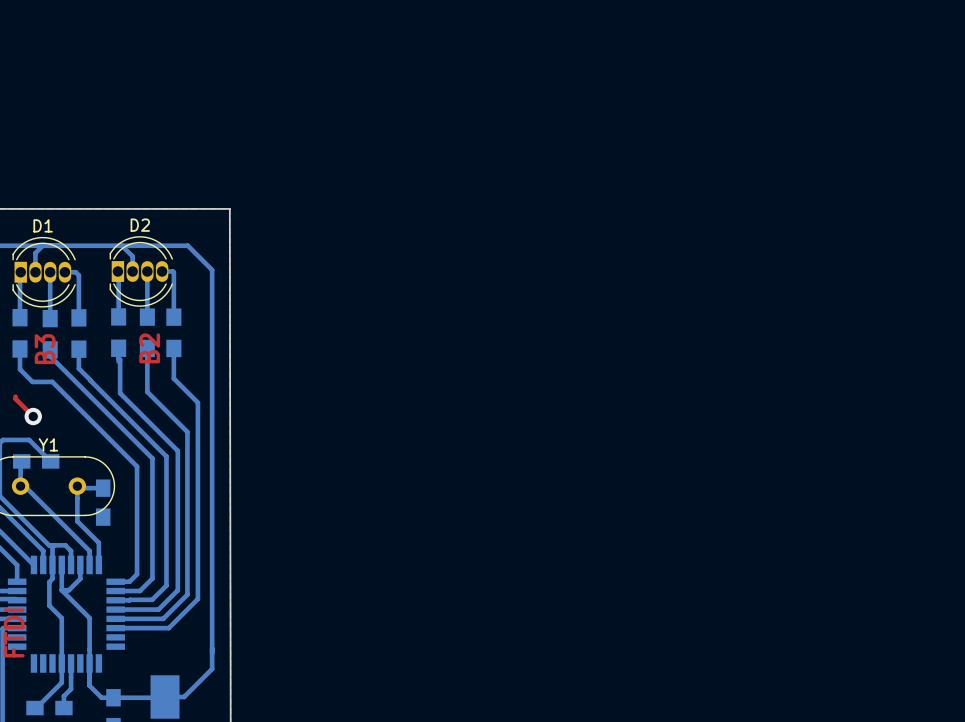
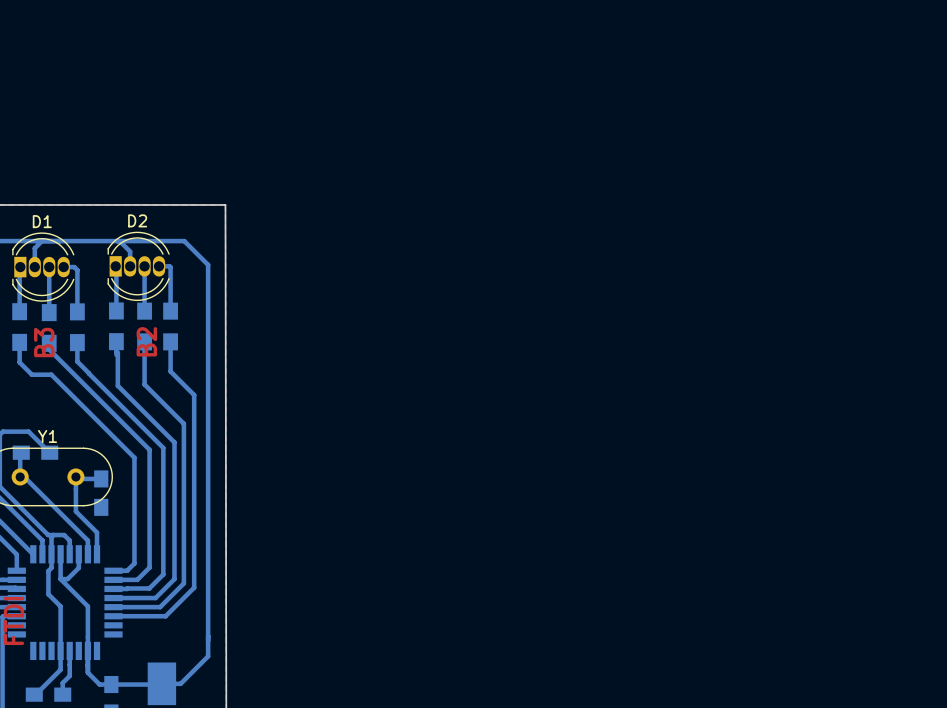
top track: (15, 396) (33, 416) -> none
via: (33, 416) -> none

